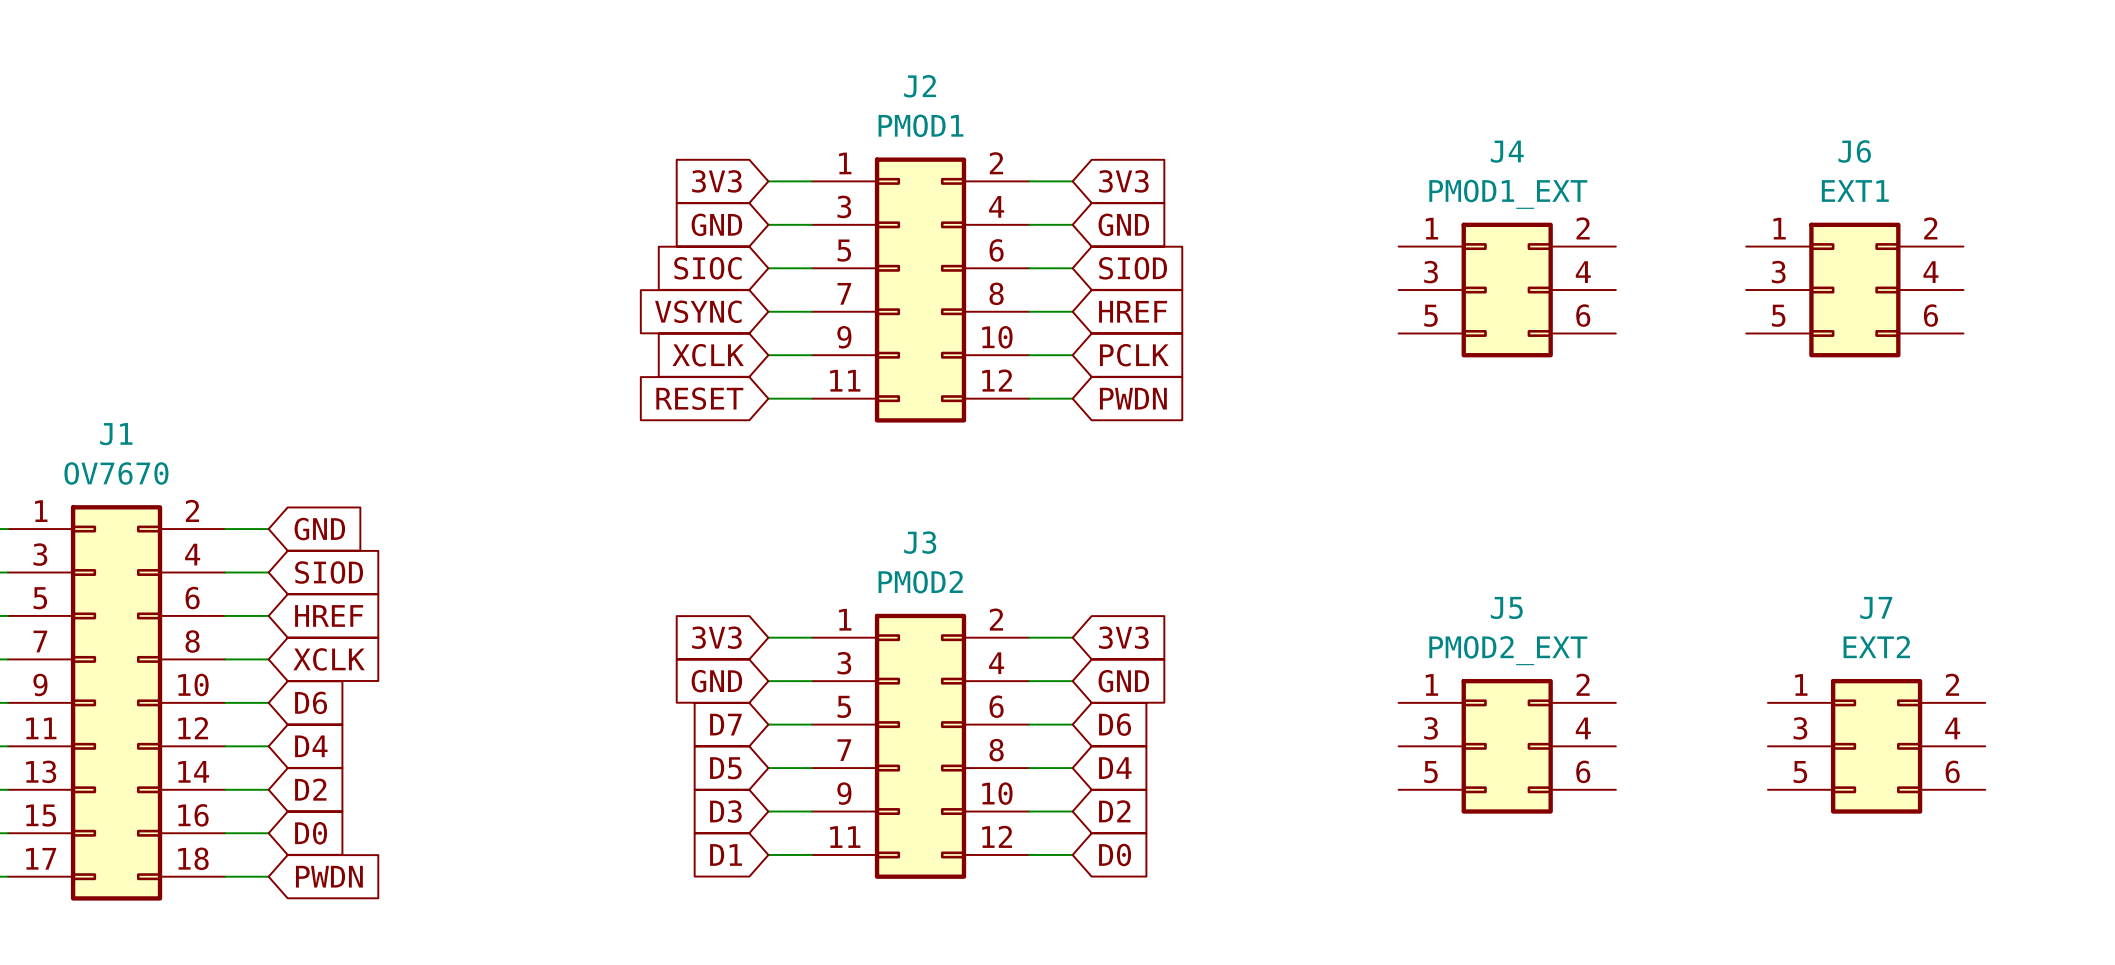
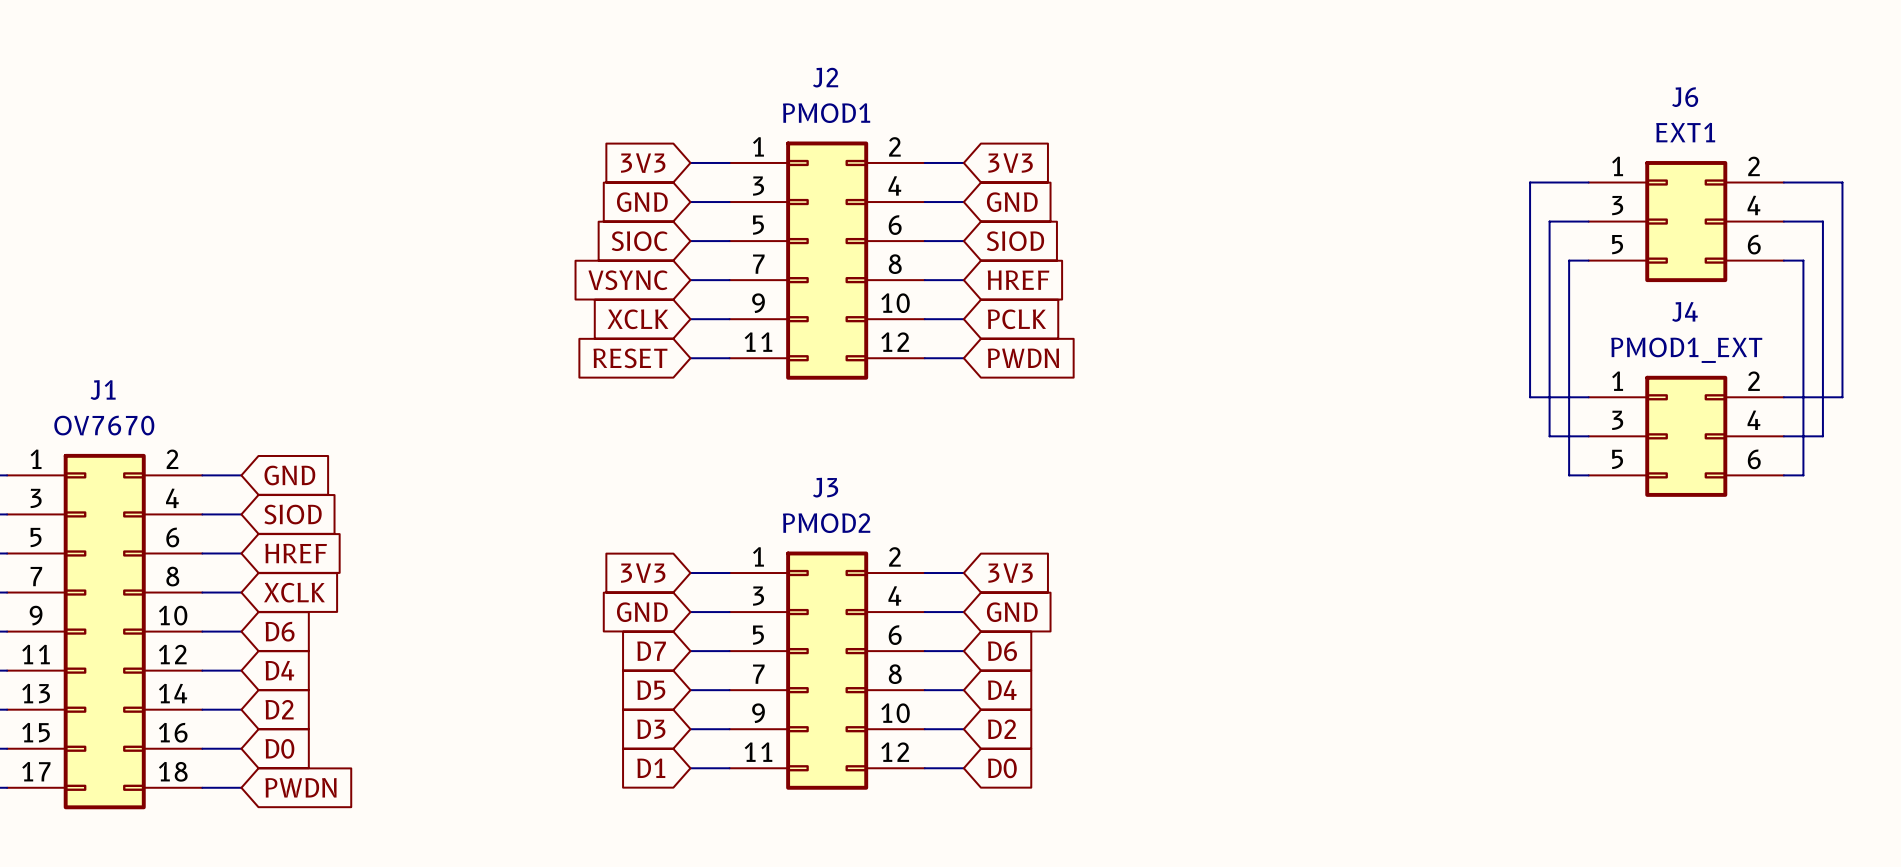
wire: none -> (1588, 182) (1530, 182) (1530, 397) (1588, 397)
wire: none -> (1783, 182) (1842, 182) (1842, 397) (1783, 397)
wire: none -> (1588, 221) (1549, 221) (1549, 436) (1588, 436)
wire: none -> (1783, 221) (1822, 221) (1822, 436) (1783, 436)
J4 position: (1507, 290) -> (1686, 436)
wire: none -> (1588, 260) (1569, 260) (1569, 475) (1588, 475)
J6 position: (1854, 290) -> (1686, 221)
wire: none -> (1783, 260) (1803, 260) (1803, 475) (1783, 475)
J5: PMOD2_EXT (1507, 746) -> none
J7: EXT2 (1876, 746) -> none

